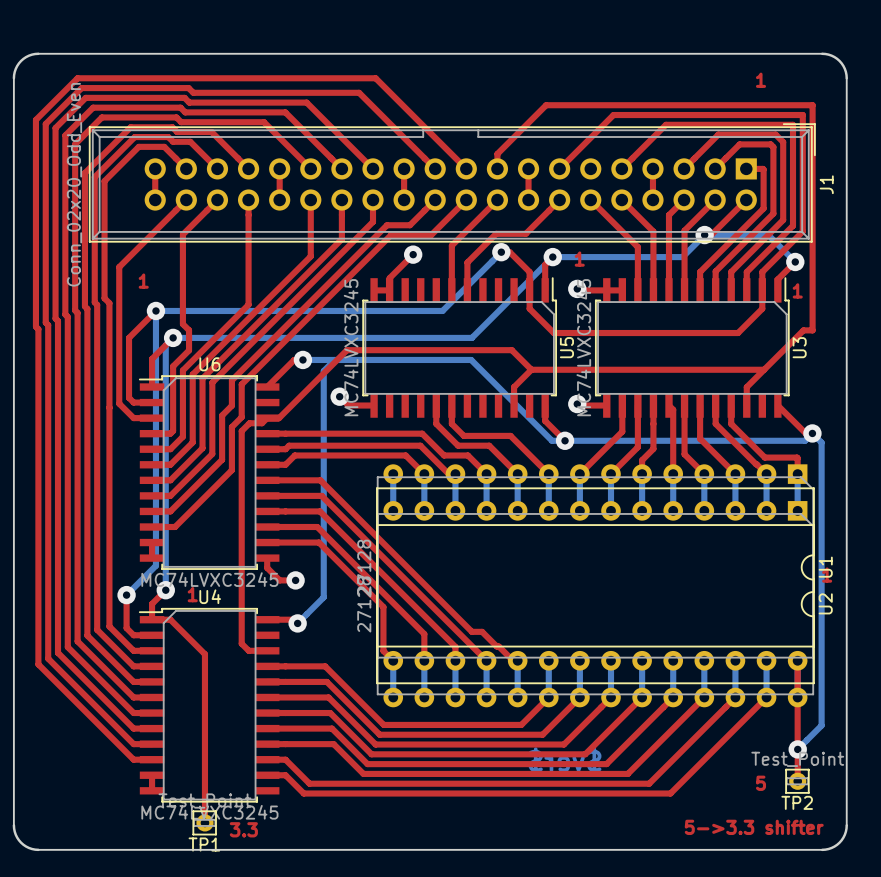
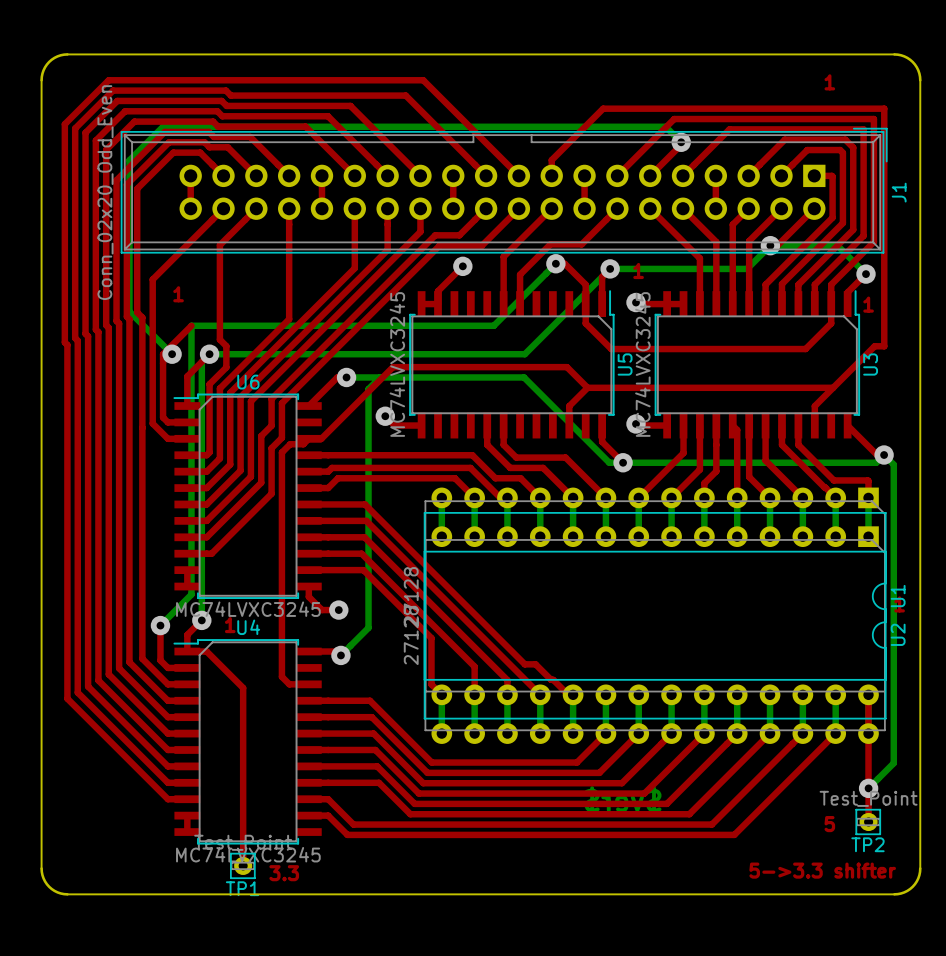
bottom track: none -> (681, 142) (665, 126) (163, 126) (129, 160) (129, 311) (172, 354)
top track: none -> (681, 142) (681, 144) (650, 175)
via: none -> (681, 142)
via position: (155, 310) -> (172, 354)

